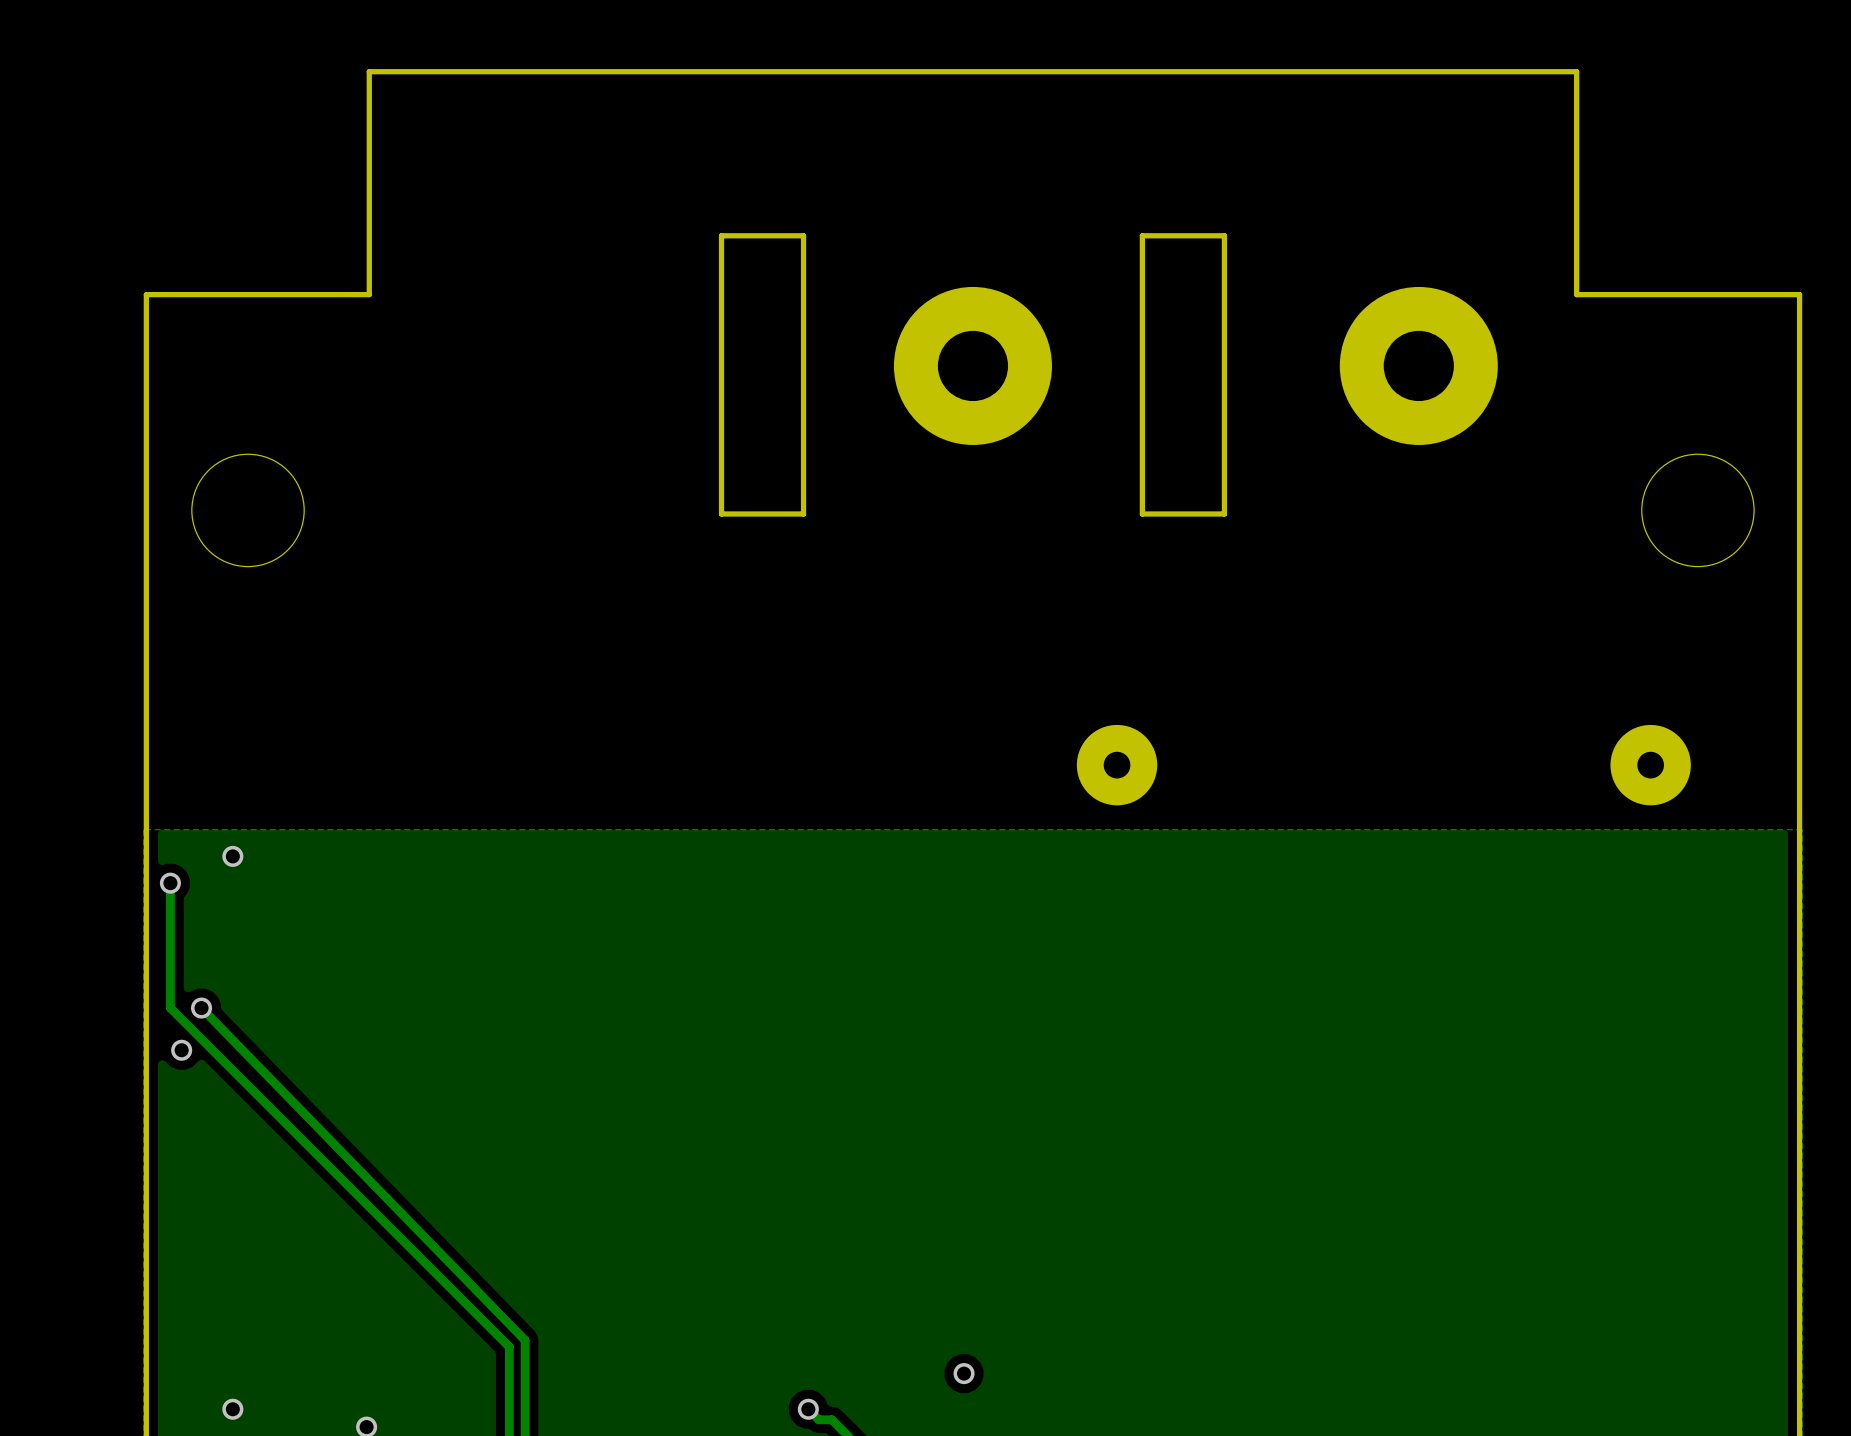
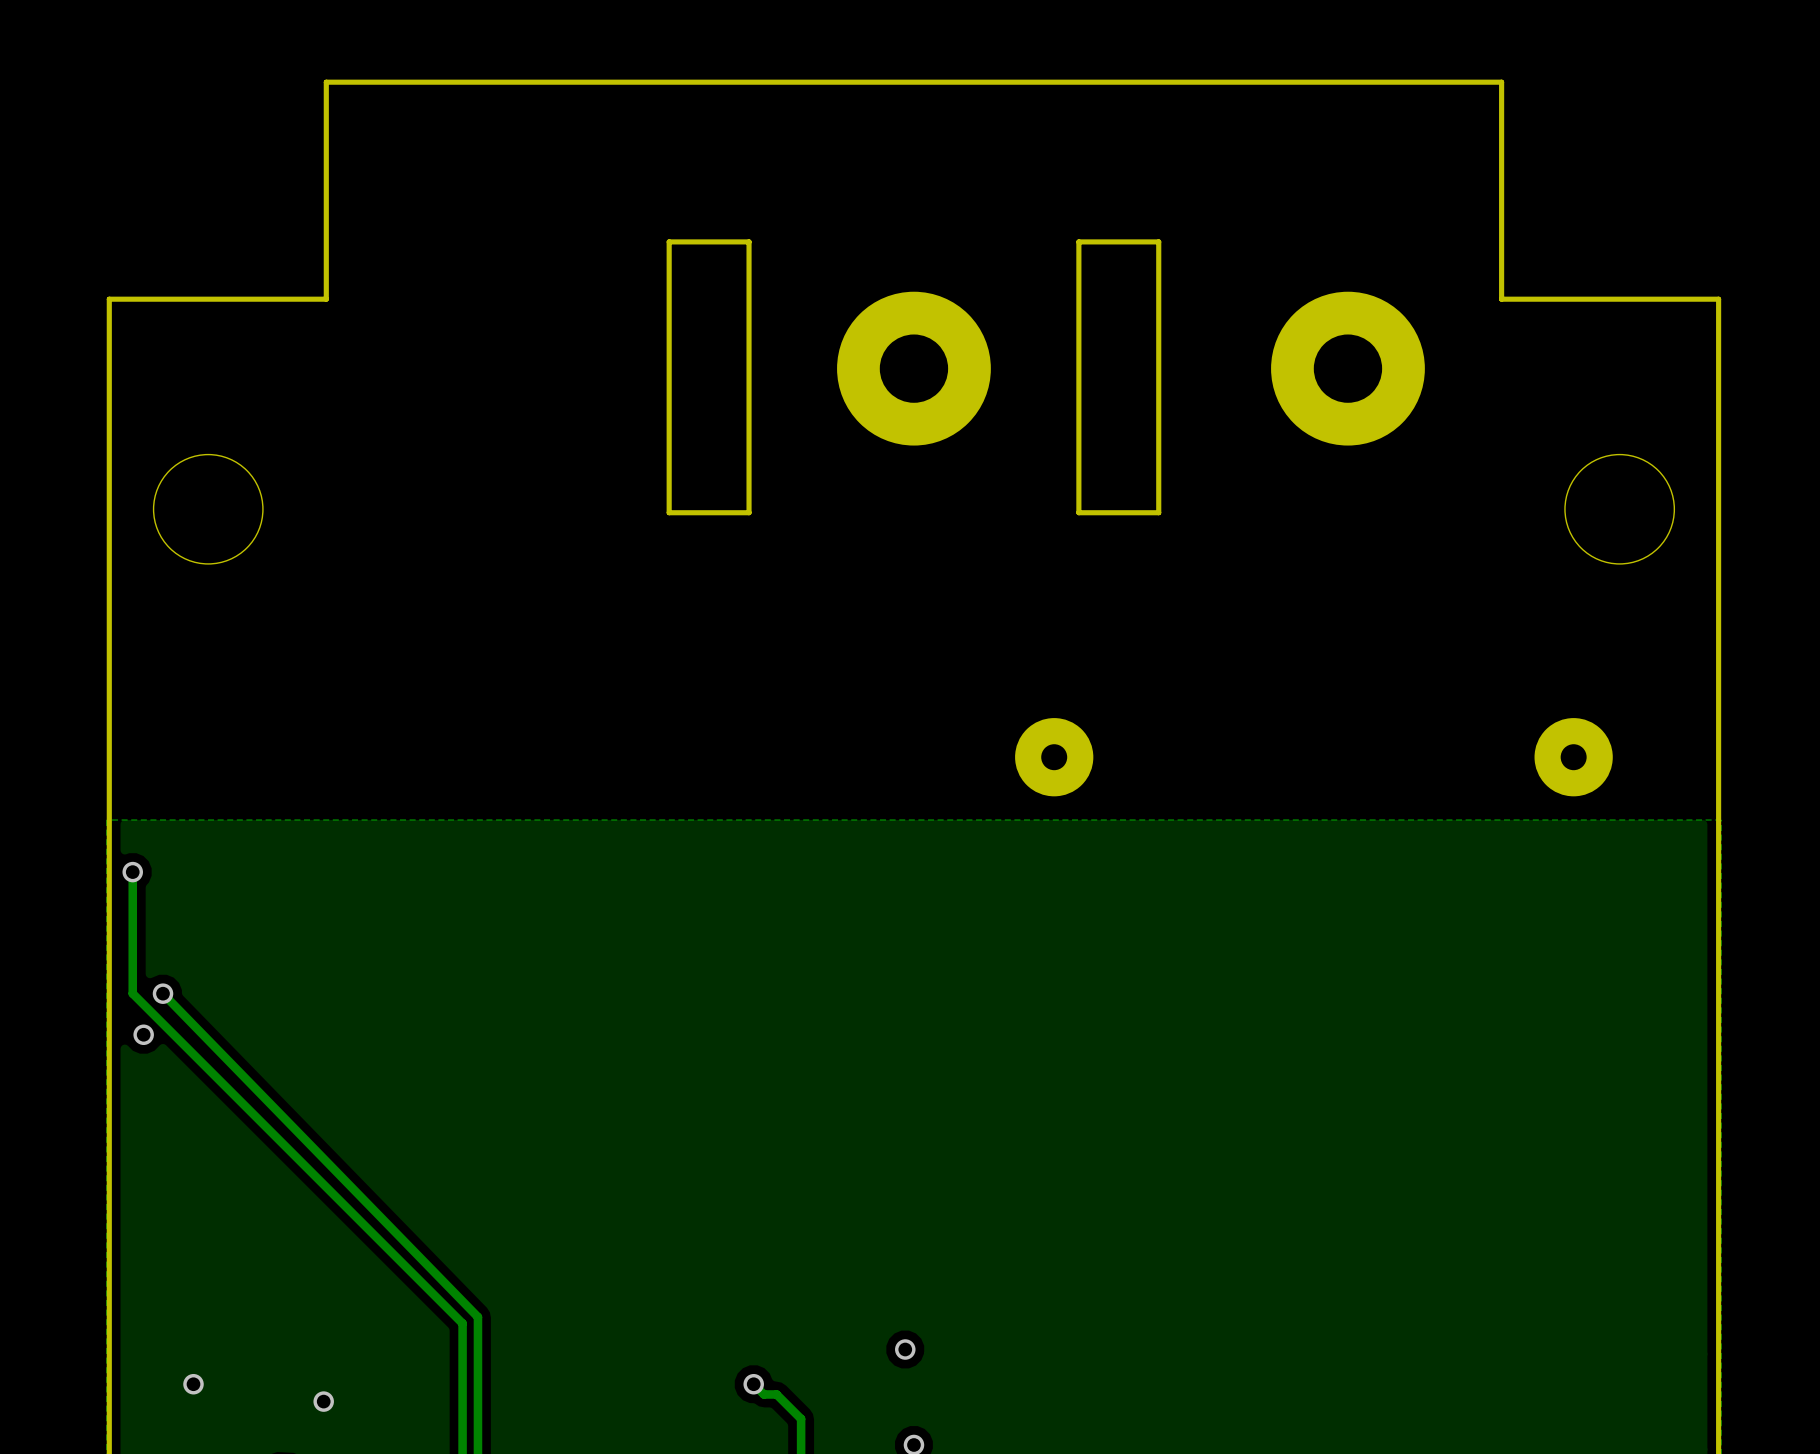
via: (232, 856) -> none

